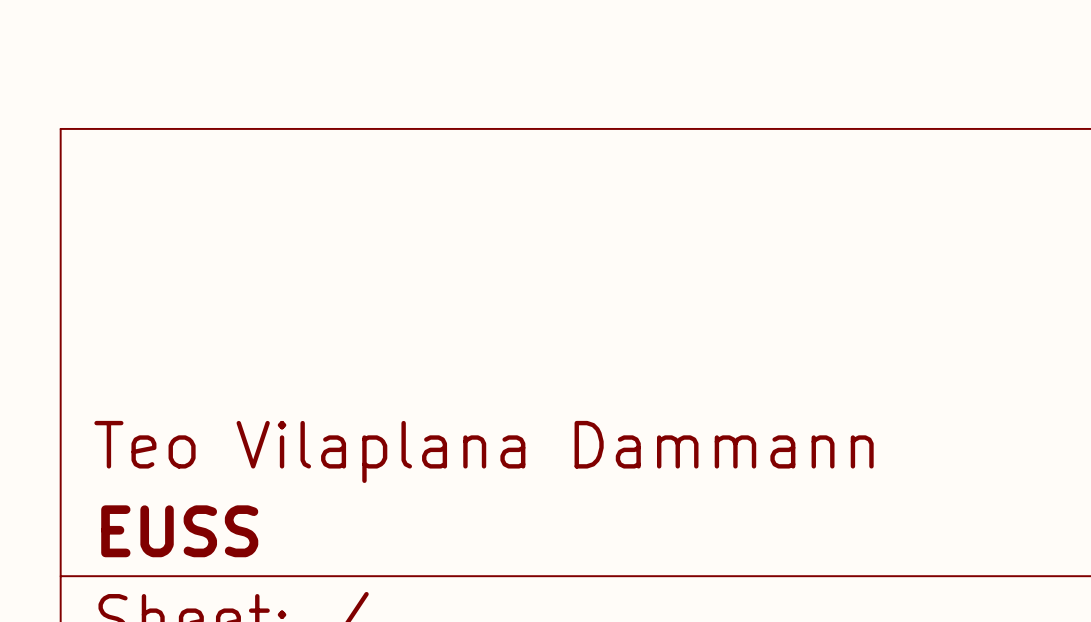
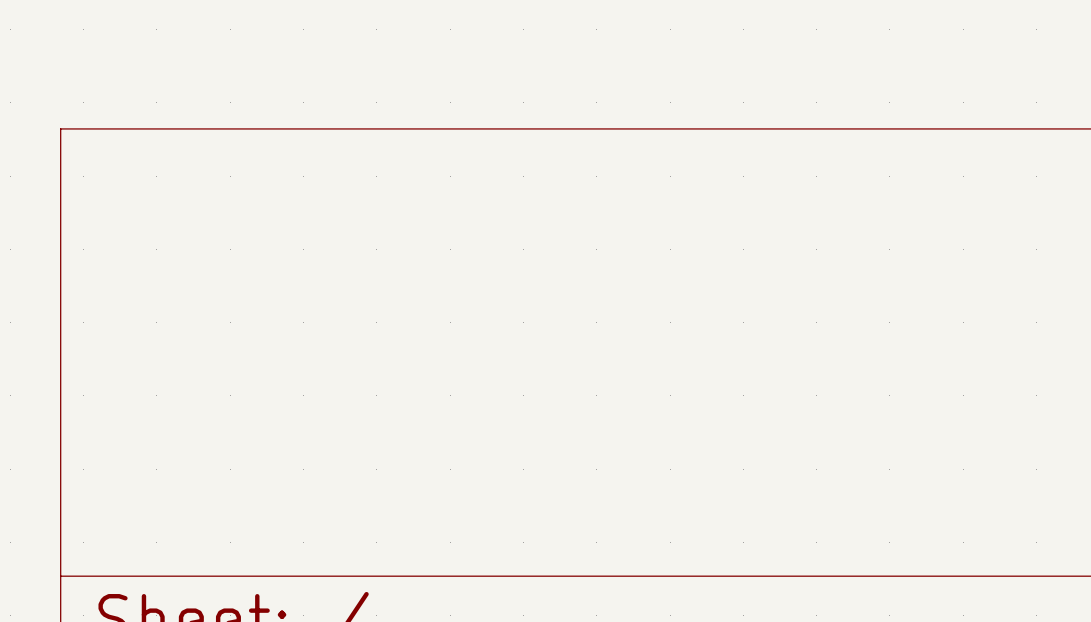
title block: Teo Vilaplana Dammann (484, 451) -> none
title block: EUSS (179, 531) -> none

